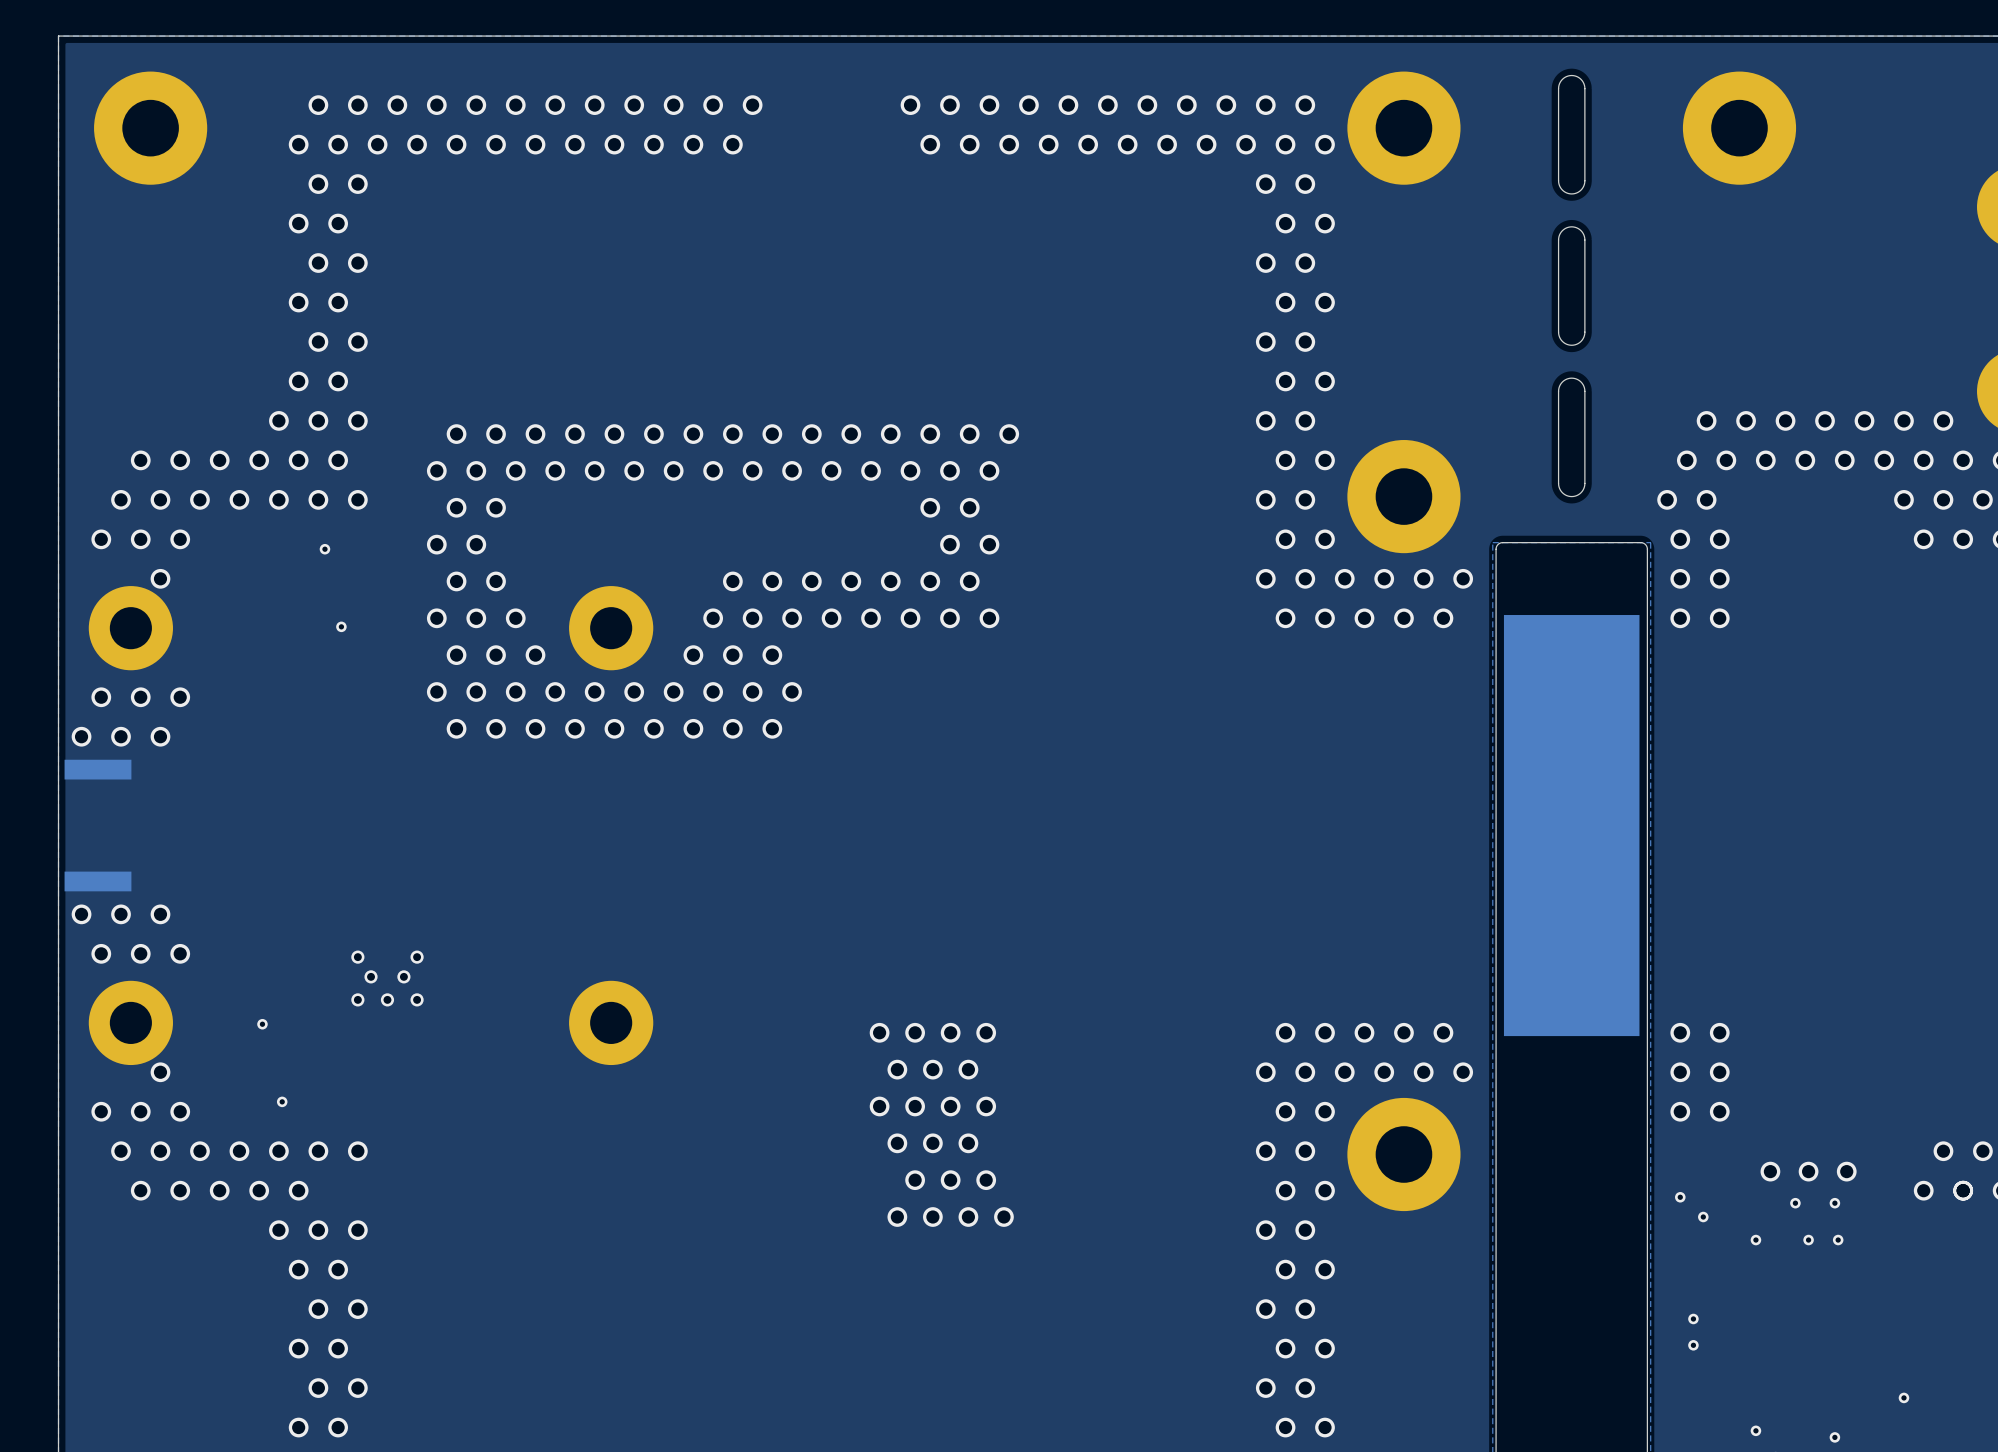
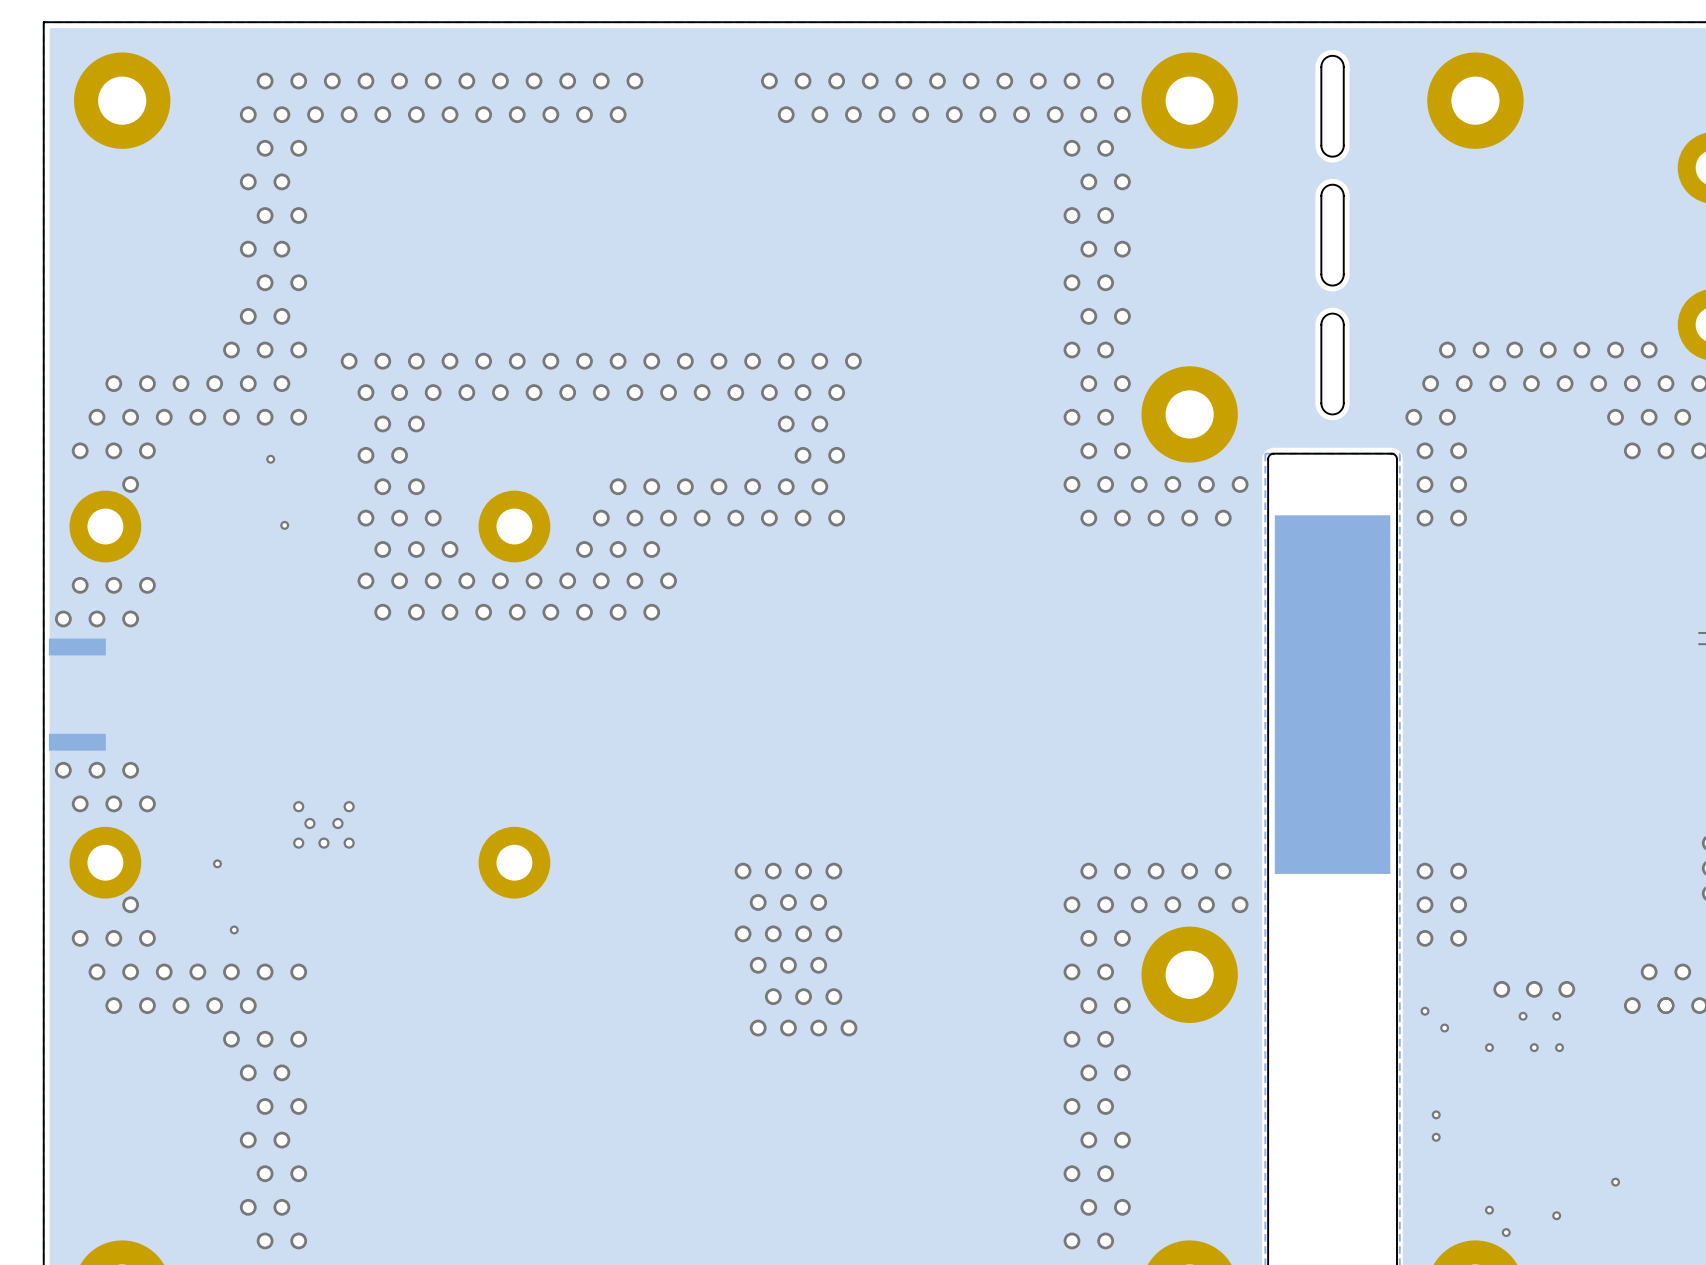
via: none -> (349, 361)

